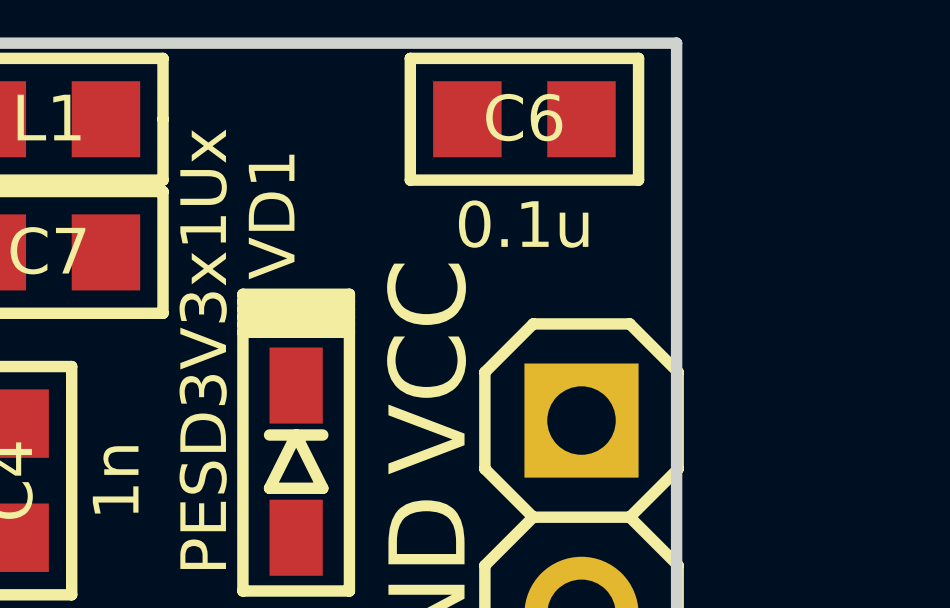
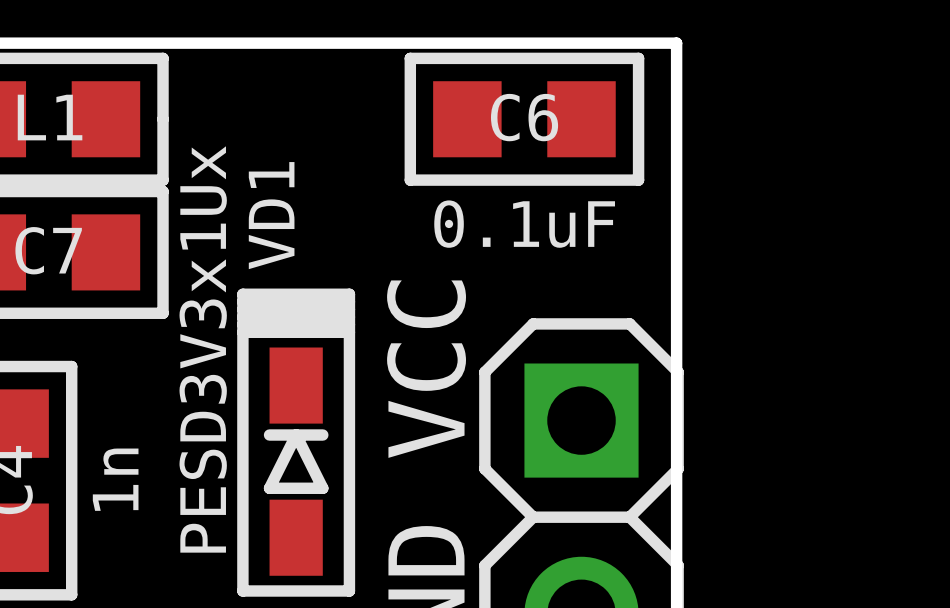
C6 value: 0.1u (523, 224) -> 0.1uF (524, 224)

